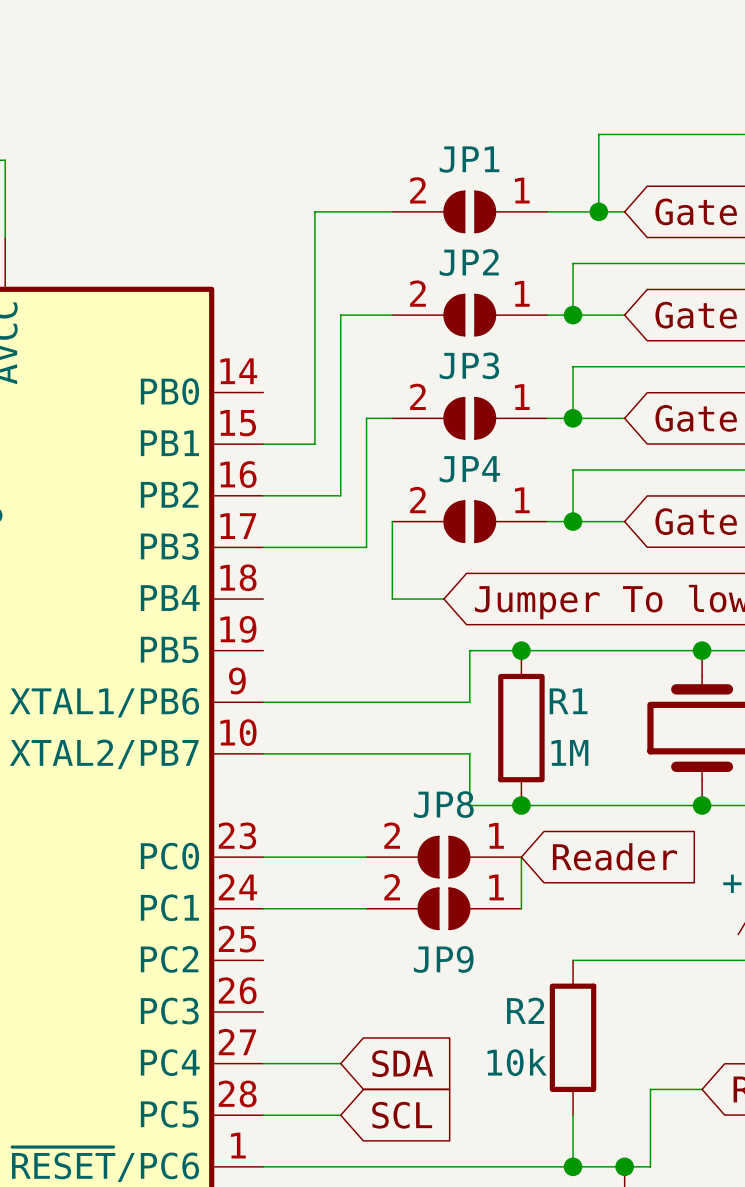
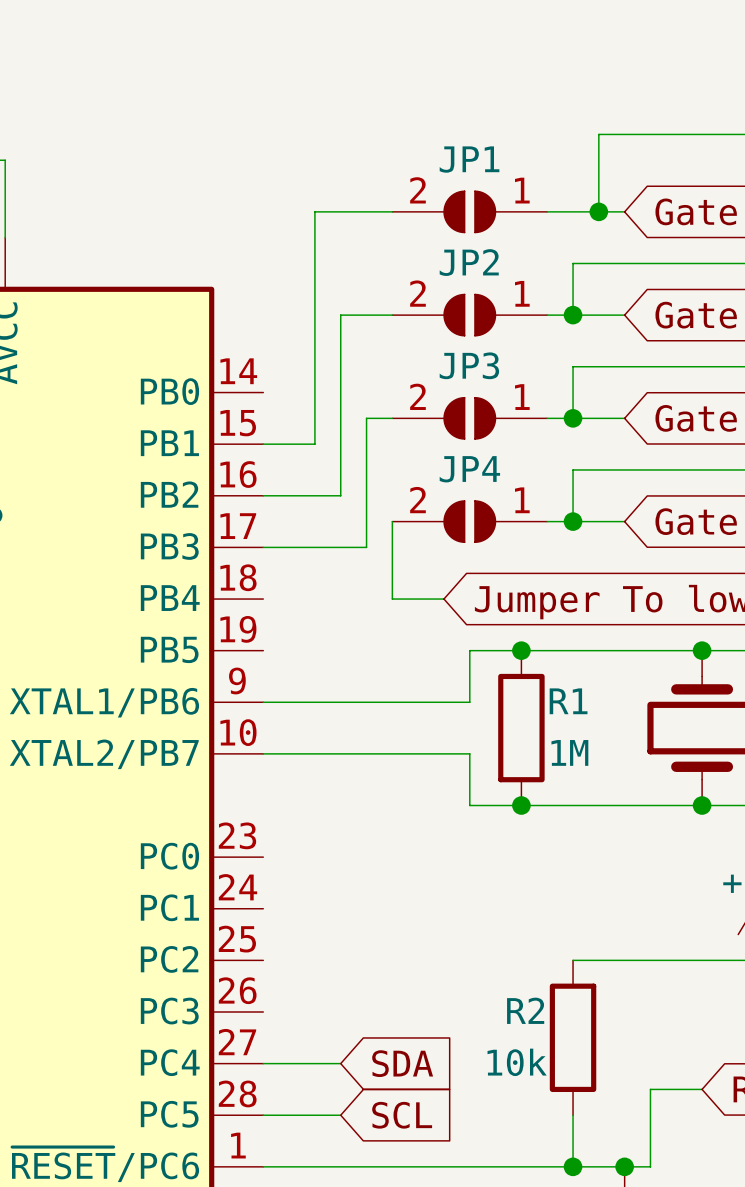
global label: Reader (614, 856) -> none
wire: (263, 857) (366, 857) -> none
JP8: (443, 857) -> none
wire: (521, 857) (521, 908) -> none
wire: (263, 908) (366, 908) -> none
JP9: (443, 908) -> none

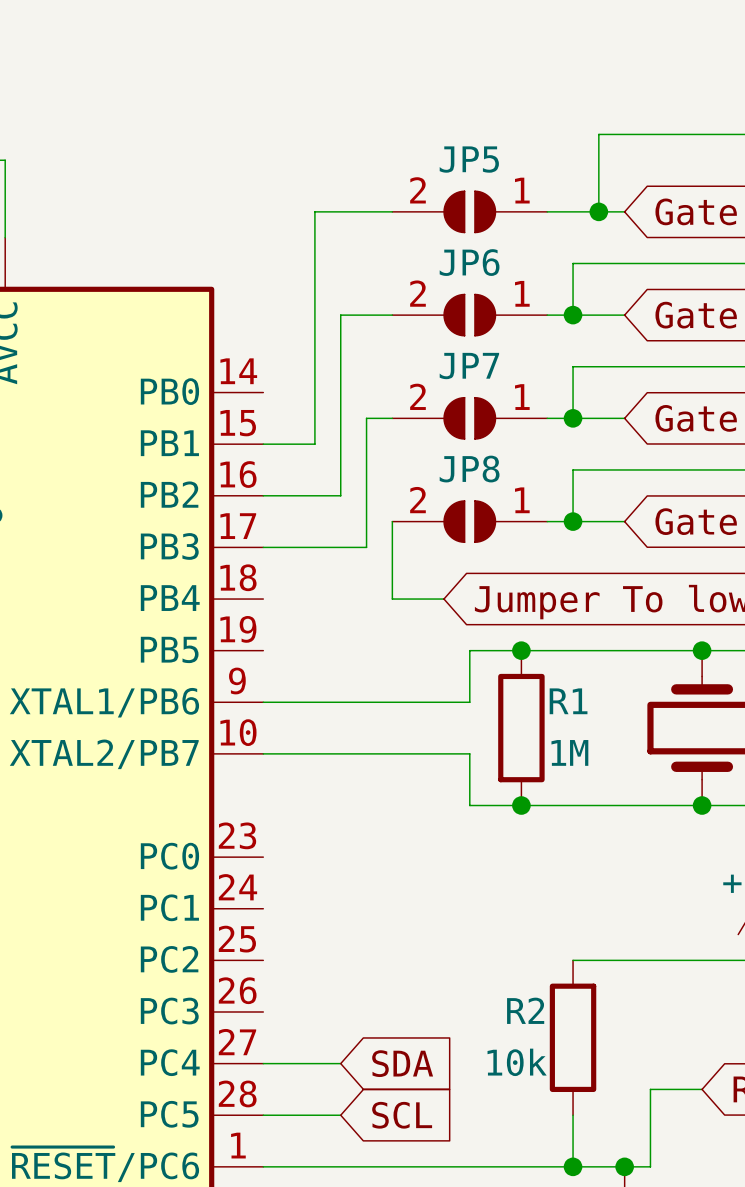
JP1 name: JP1 (469, 159) -> JP5 (469, 159)
JP2 name: JP2 (469, 262) -> JP6 (469, 262)
JP3 name: JP3 (469, 365) -> JP7 (469, 366)
JP4 name: JP4 (469, 469) -> JP8 (469, 469)

